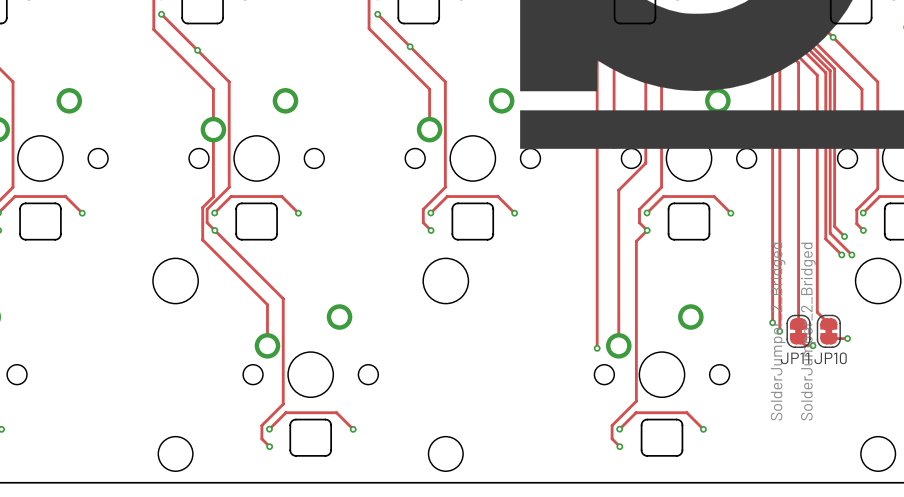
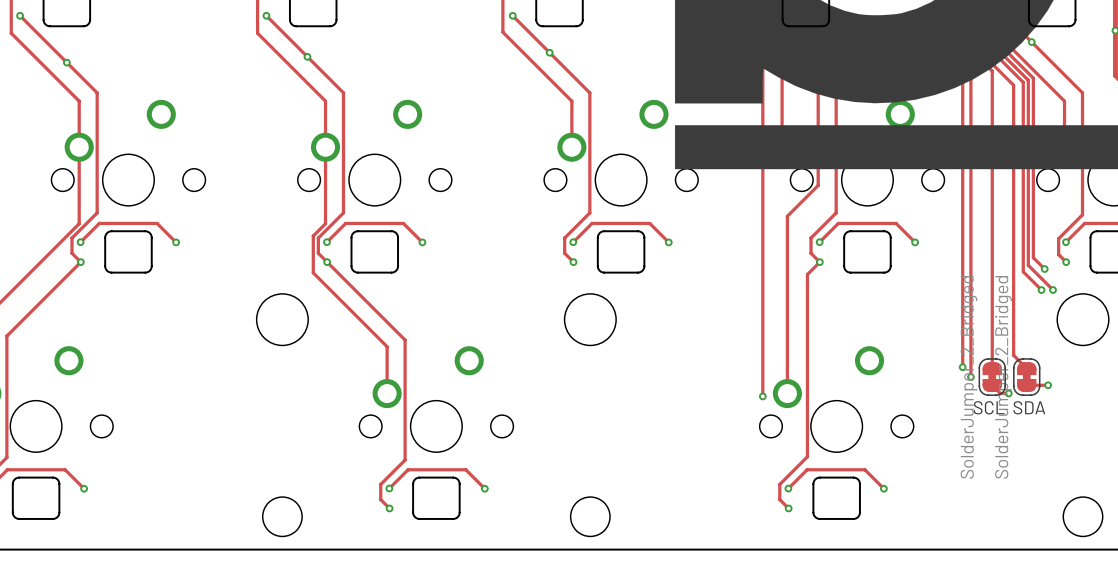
JP11 name: JP11 (795, 358) -> SCL (989, 407)
JP10 name: JP10 (830, 358) -> SDA (1029, 407)

